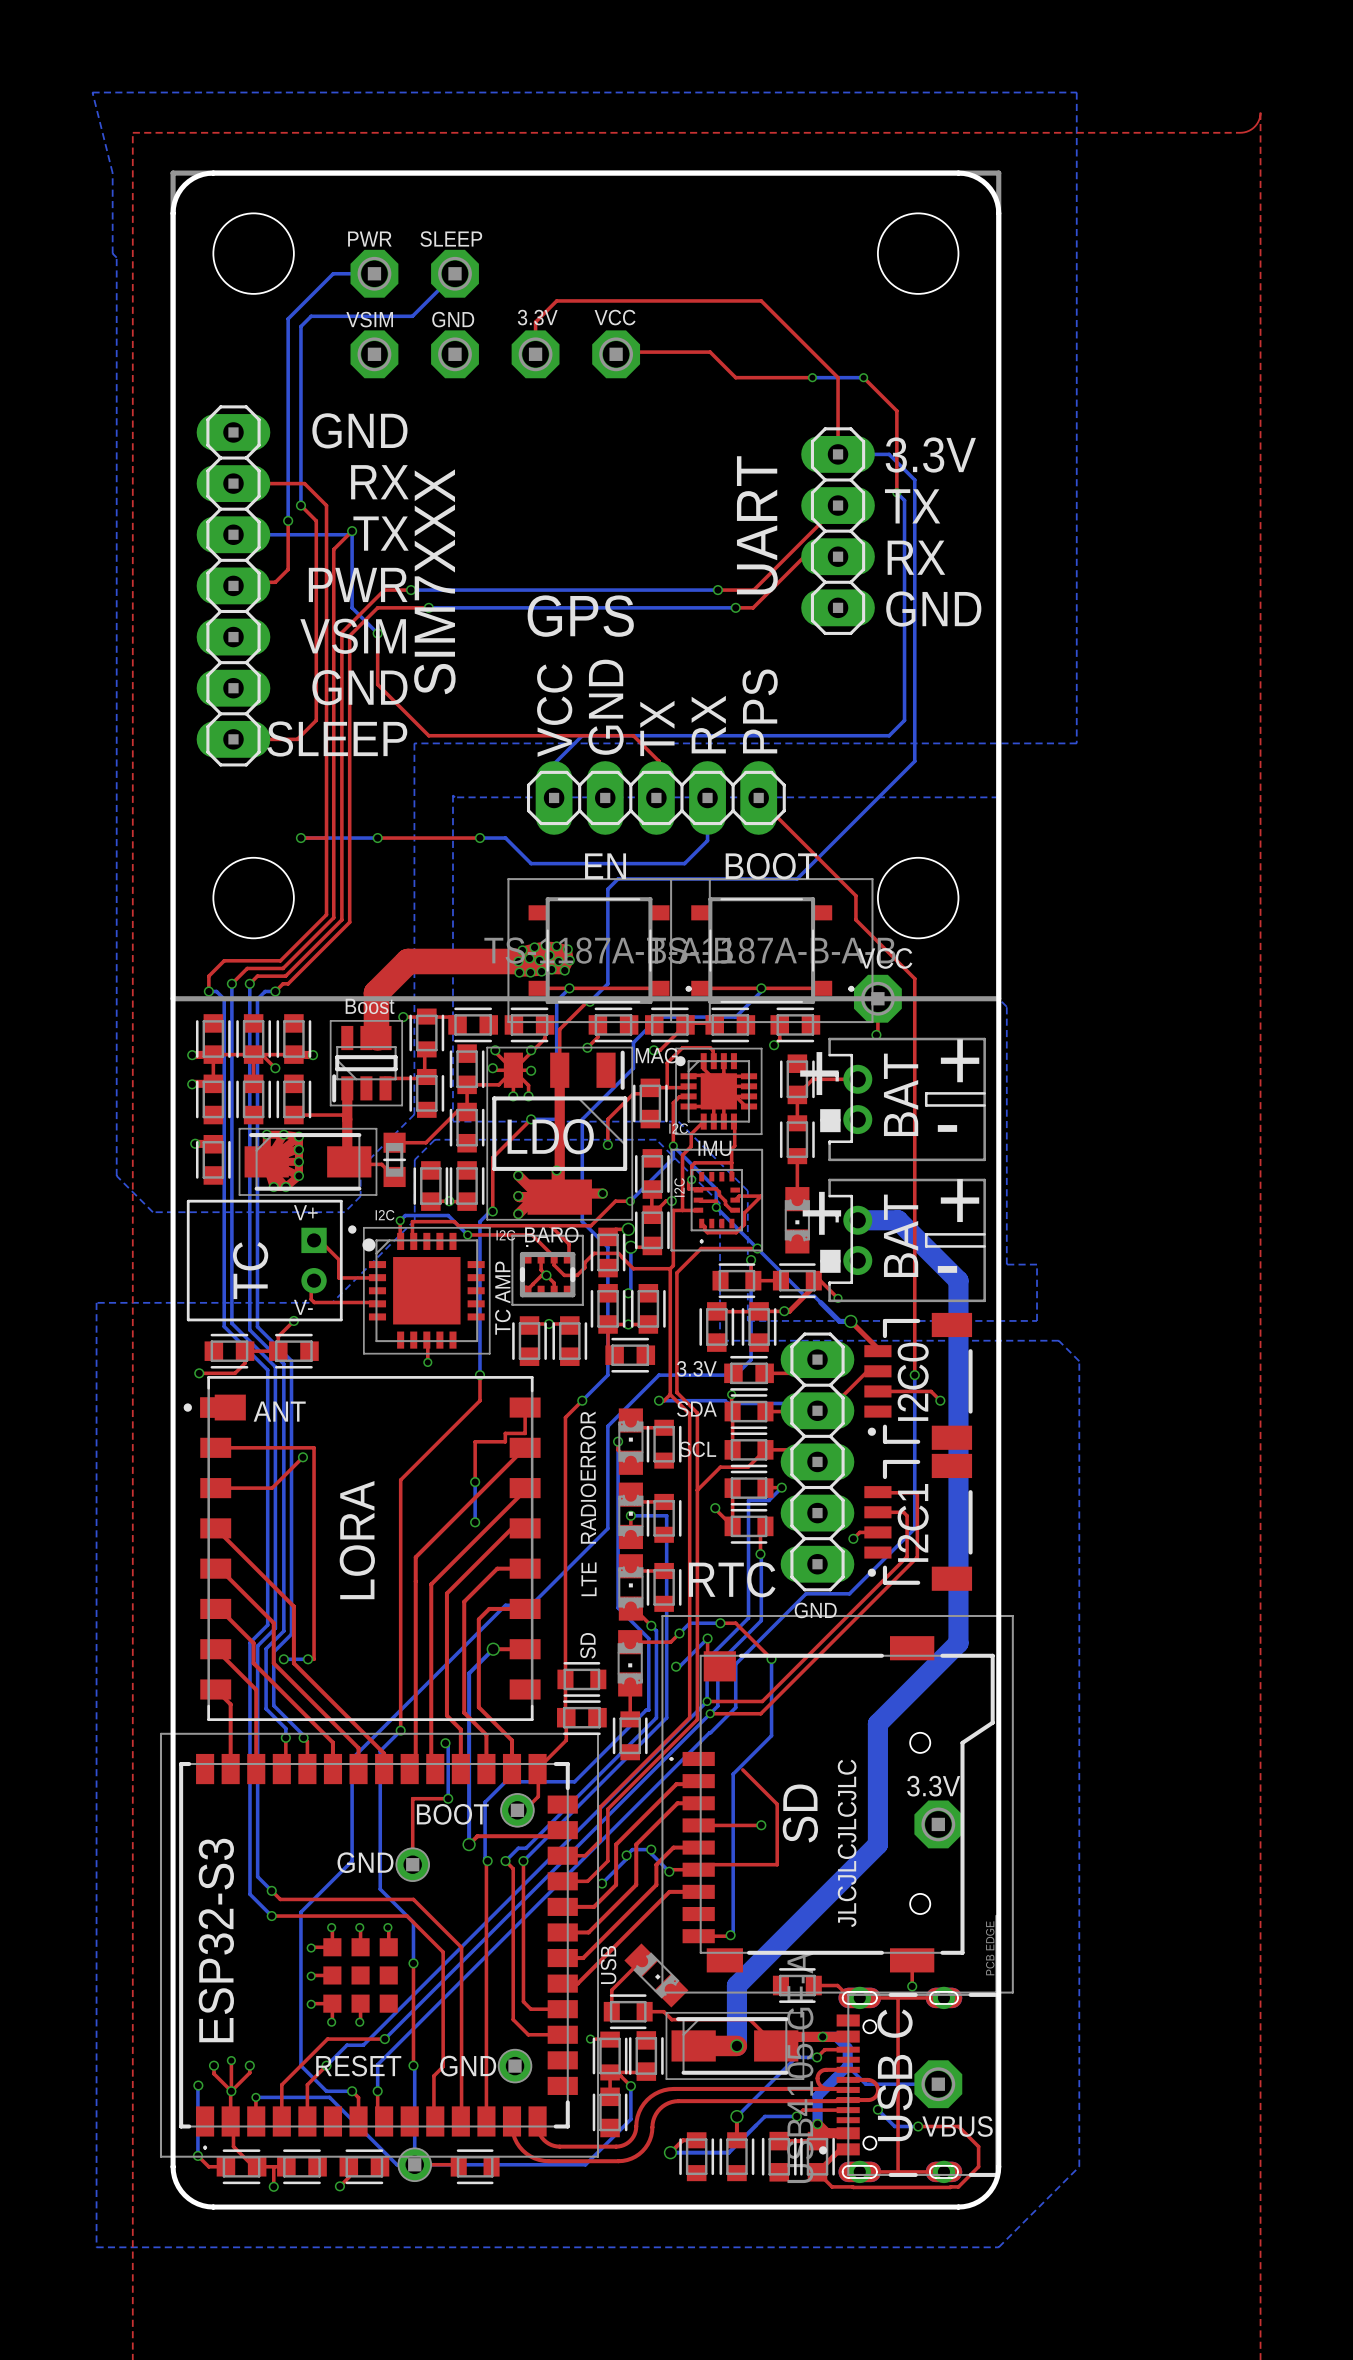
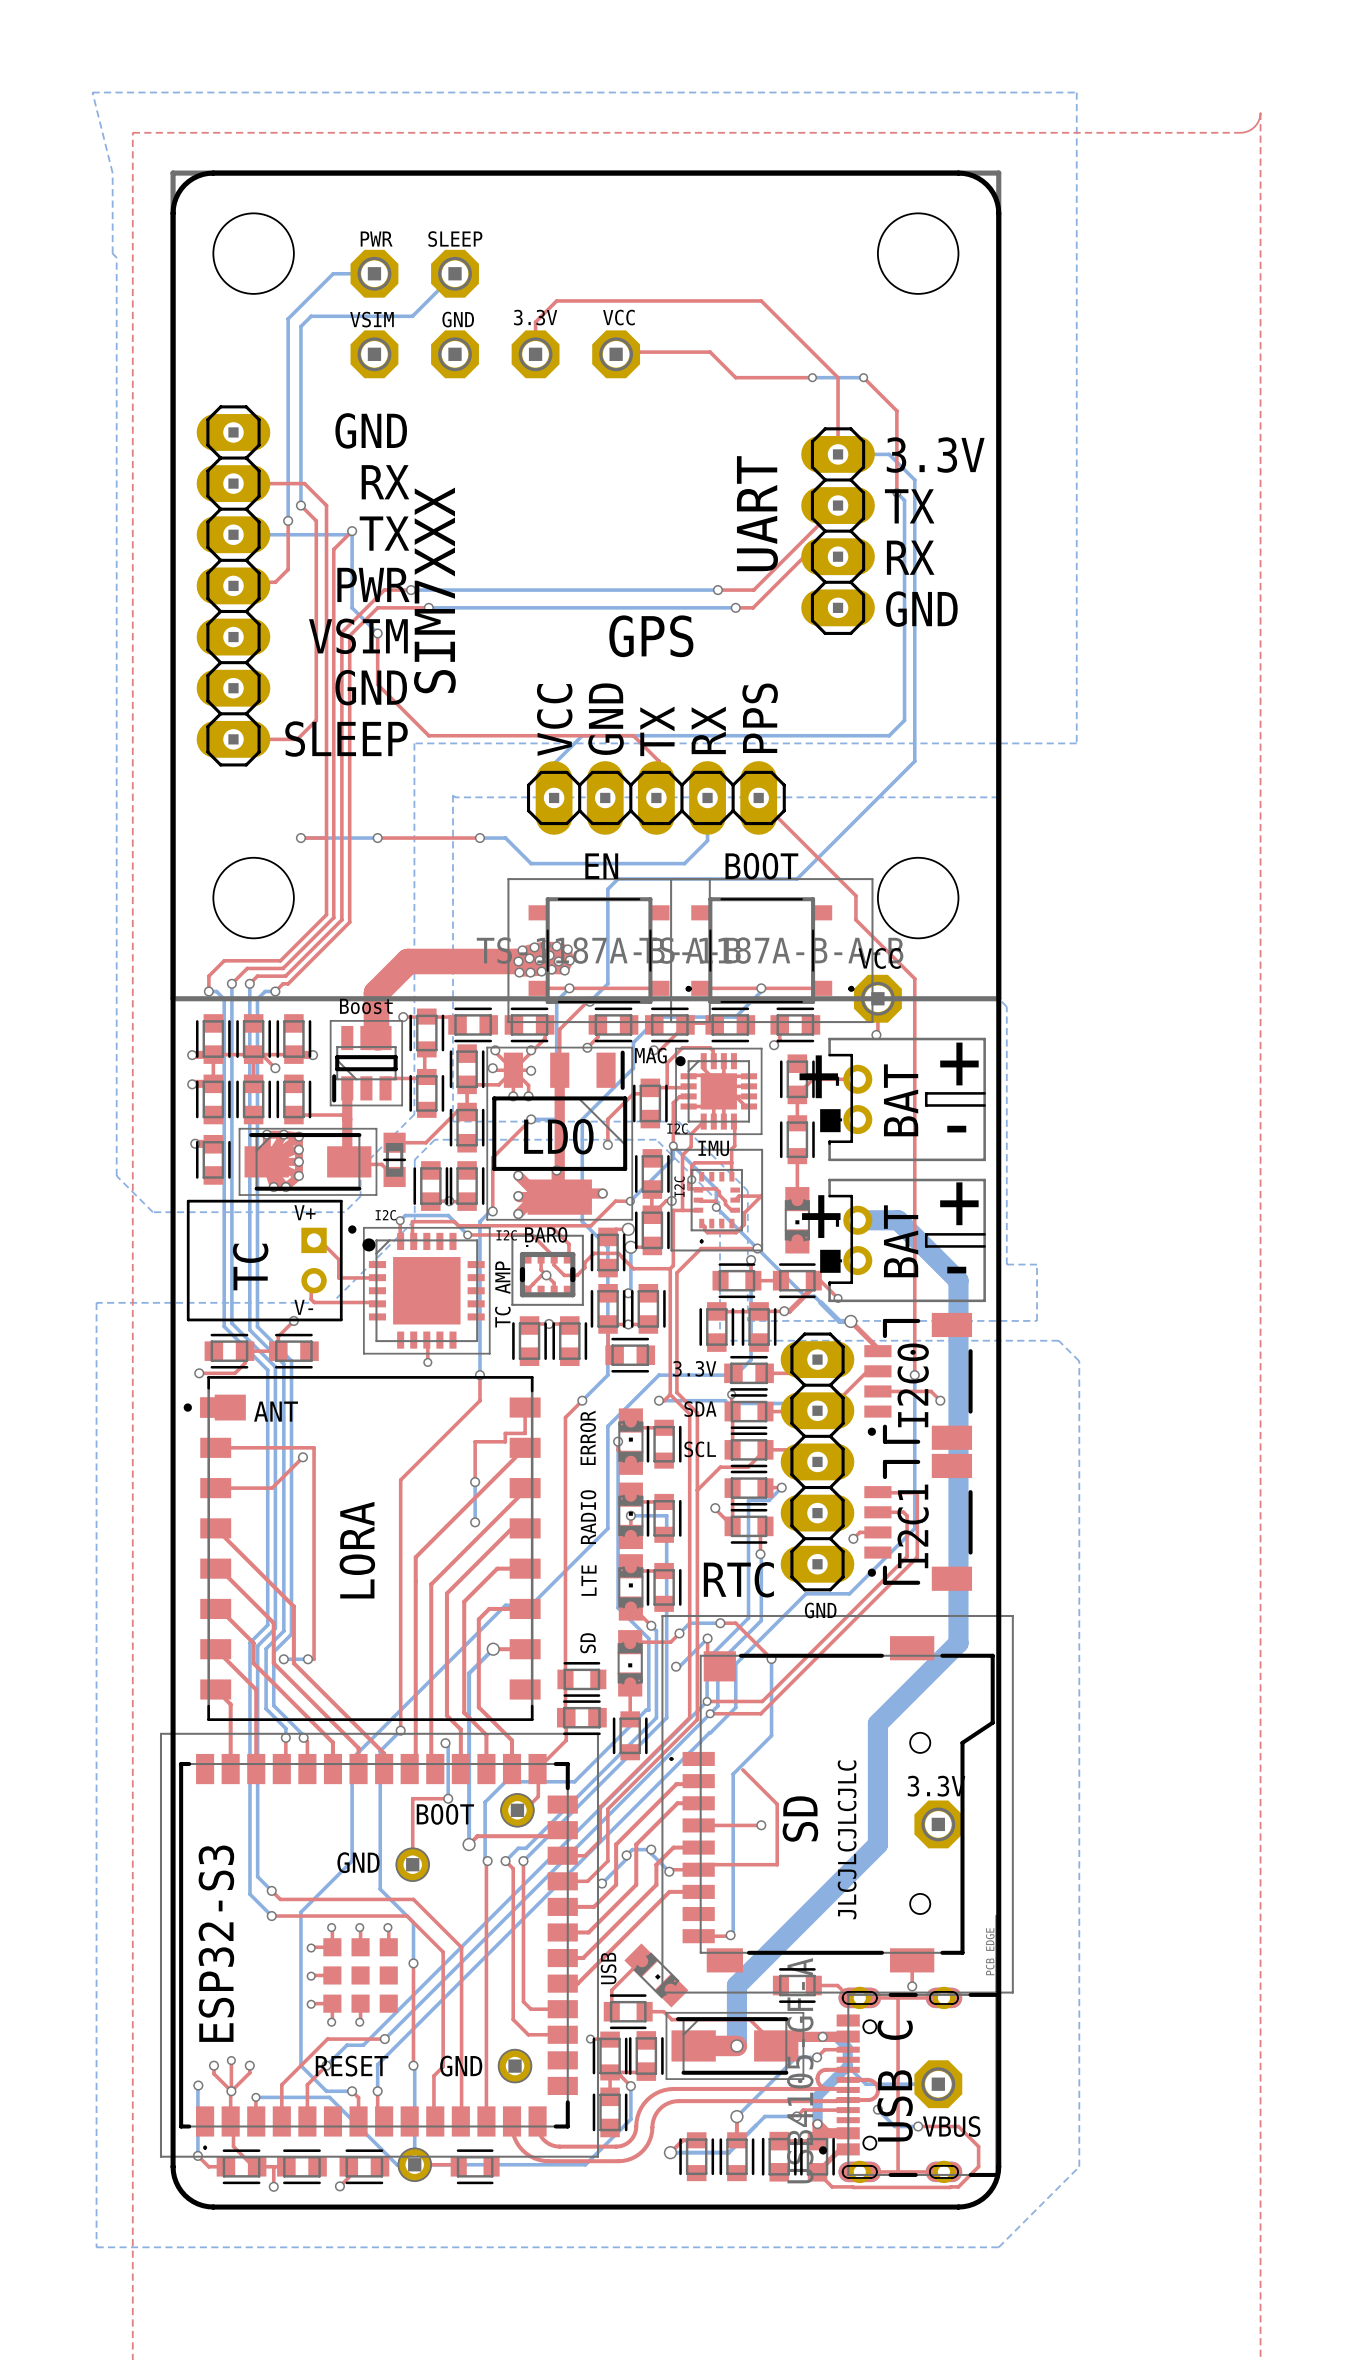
text position: GPS (580, 616) -> GPS (651, 636)

